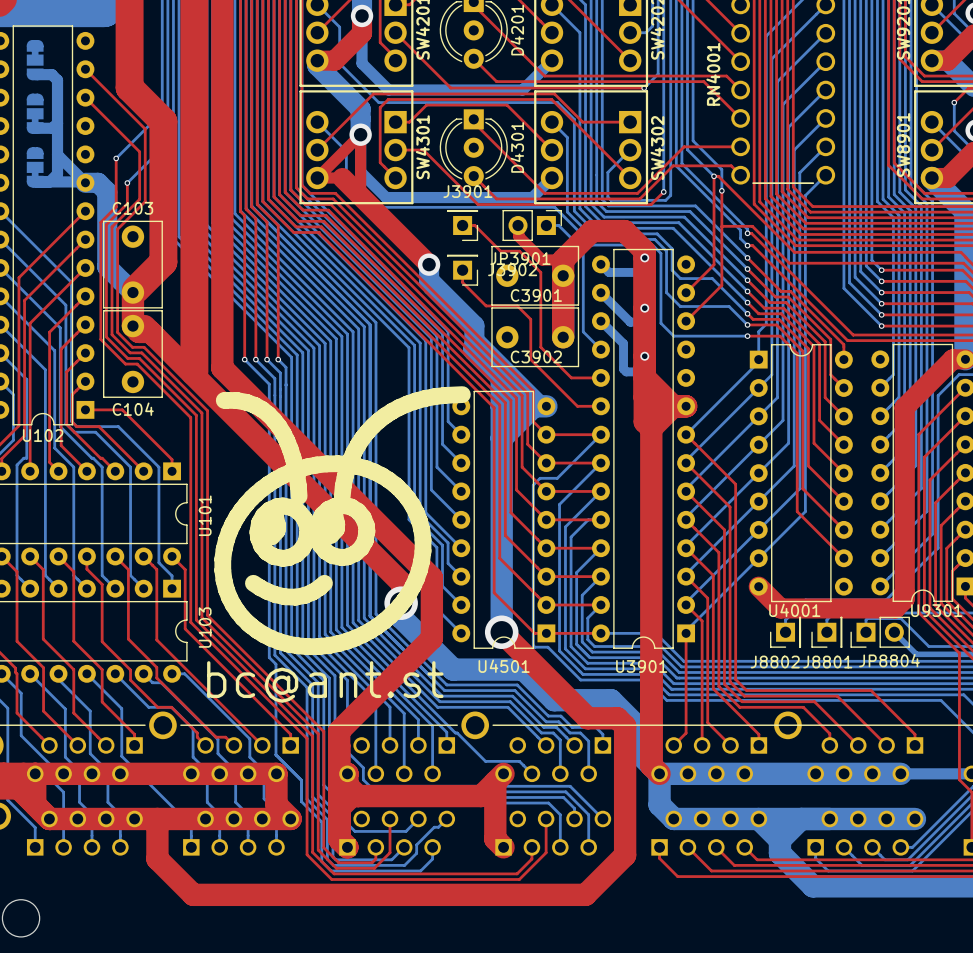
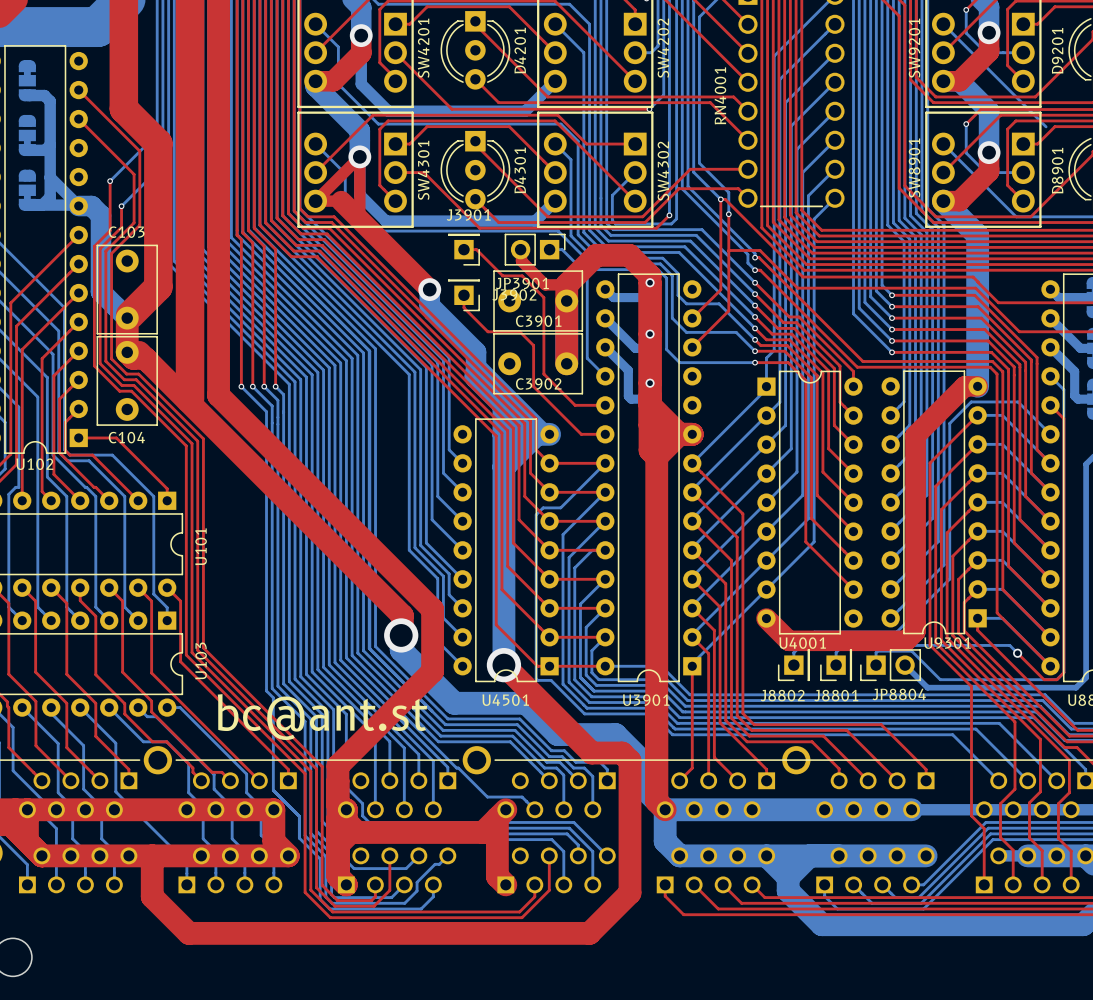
drawing: [214, 386, 471, 656] -> none

